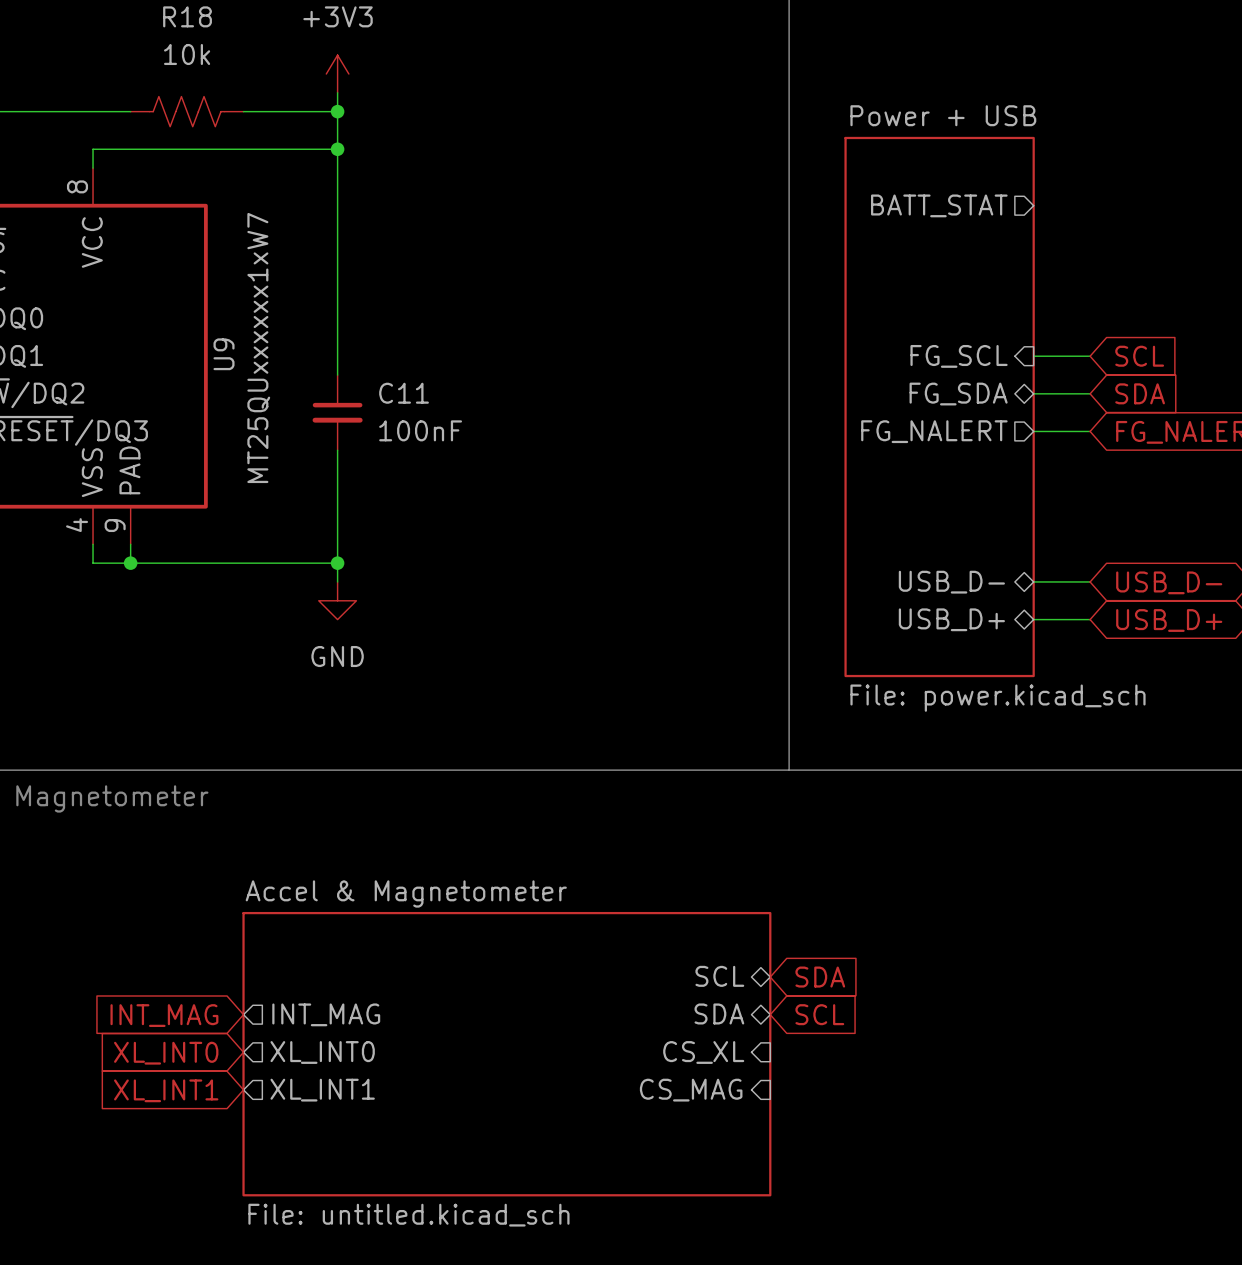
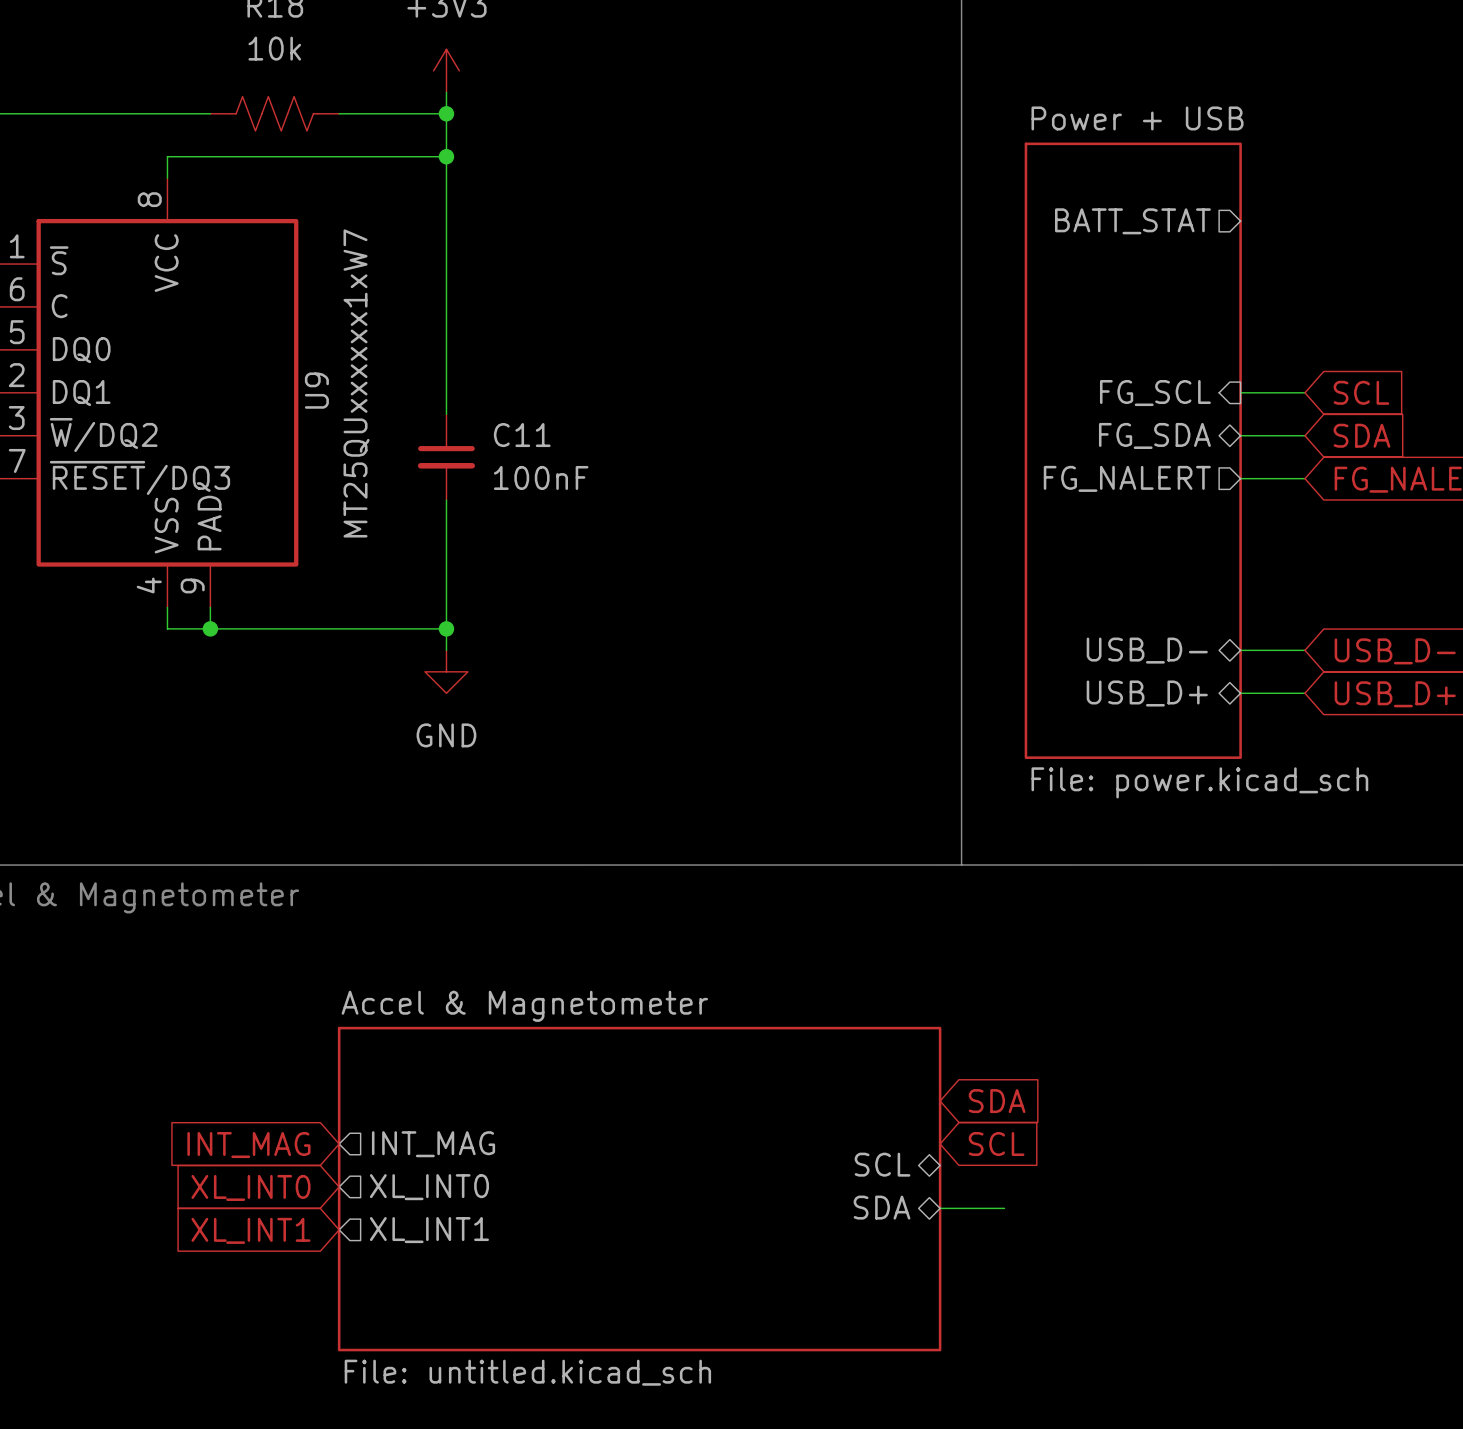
sheet pin position: SCL (719, 976) -> SCL (882, 1164)
sheet pin position: SDA (719, 1013) -> SDA (882, 1207)
sheet pin: CS_XL (703, 1052) -> none
wire: none -> (940, 1208) (1004, 1208)
sheet pin: CS_MAG (691, 1090) -> none

